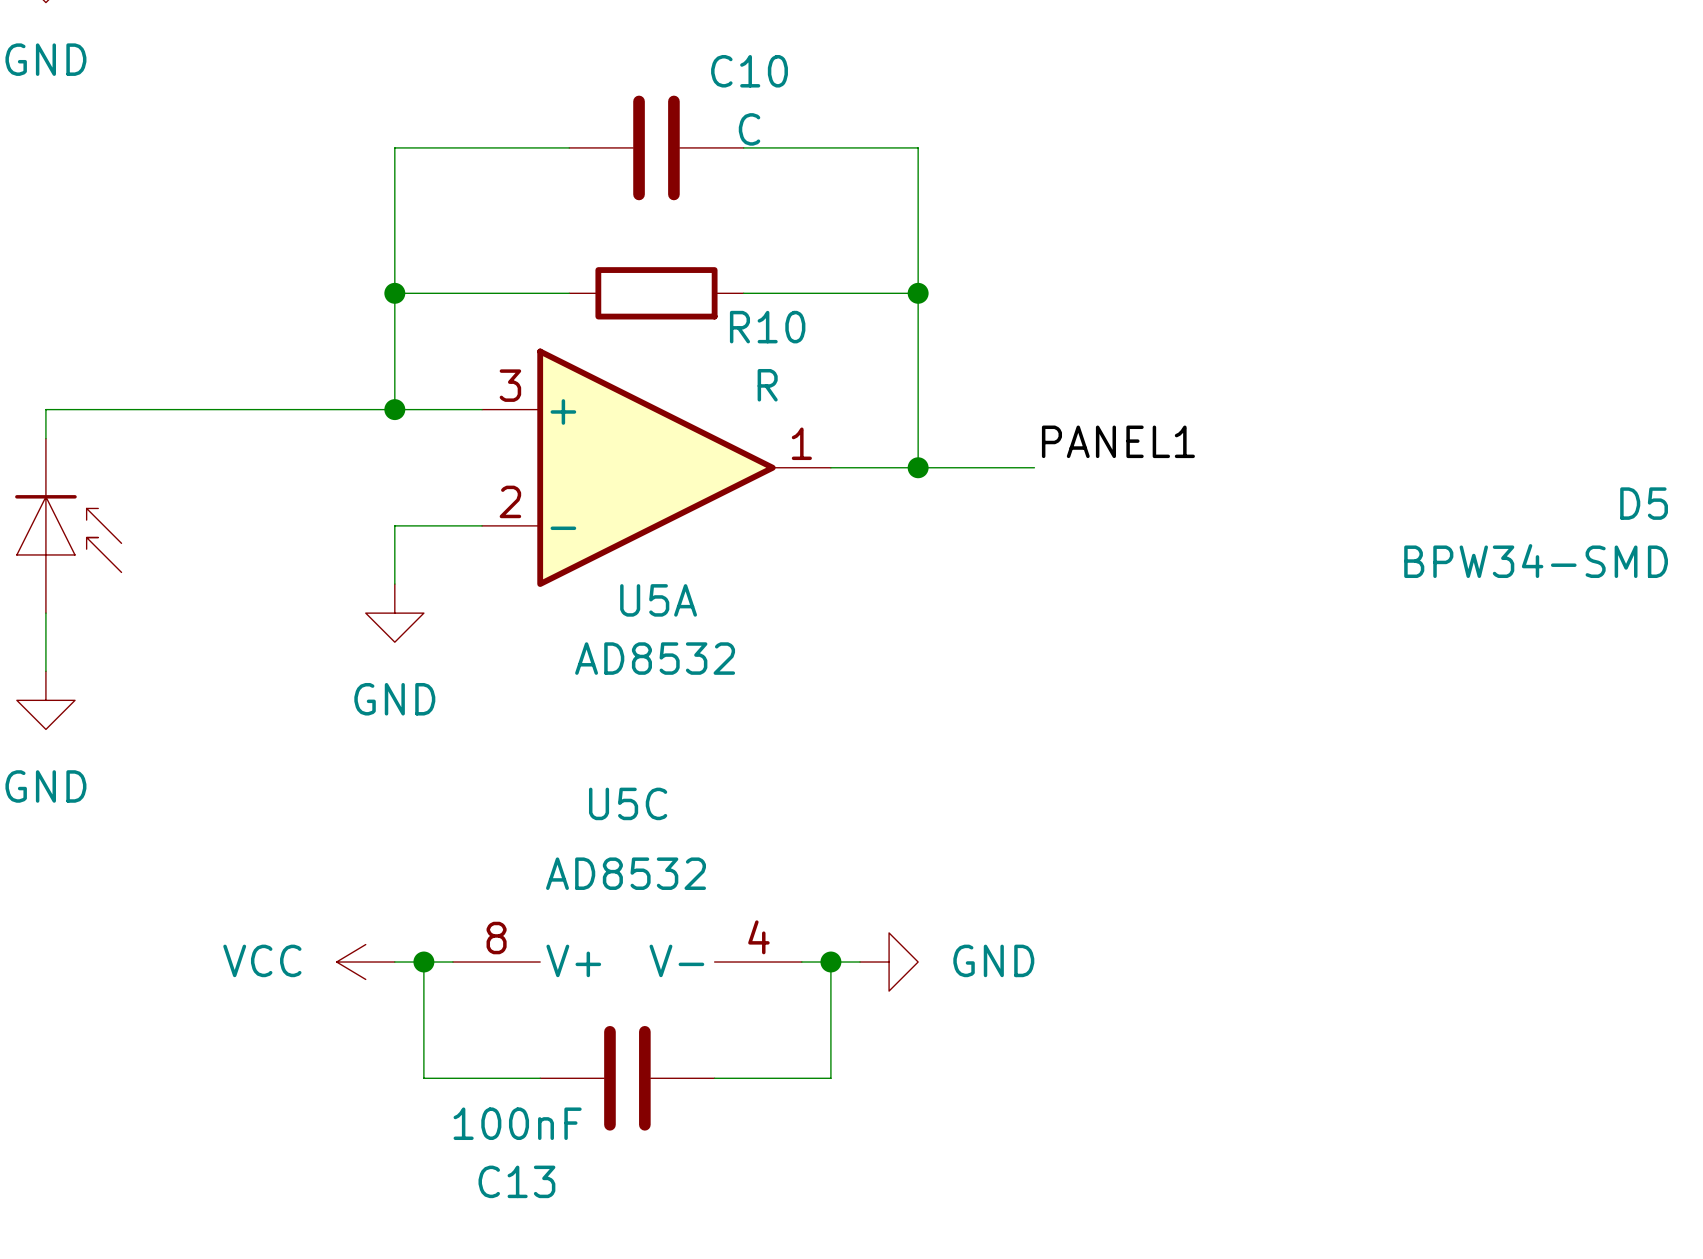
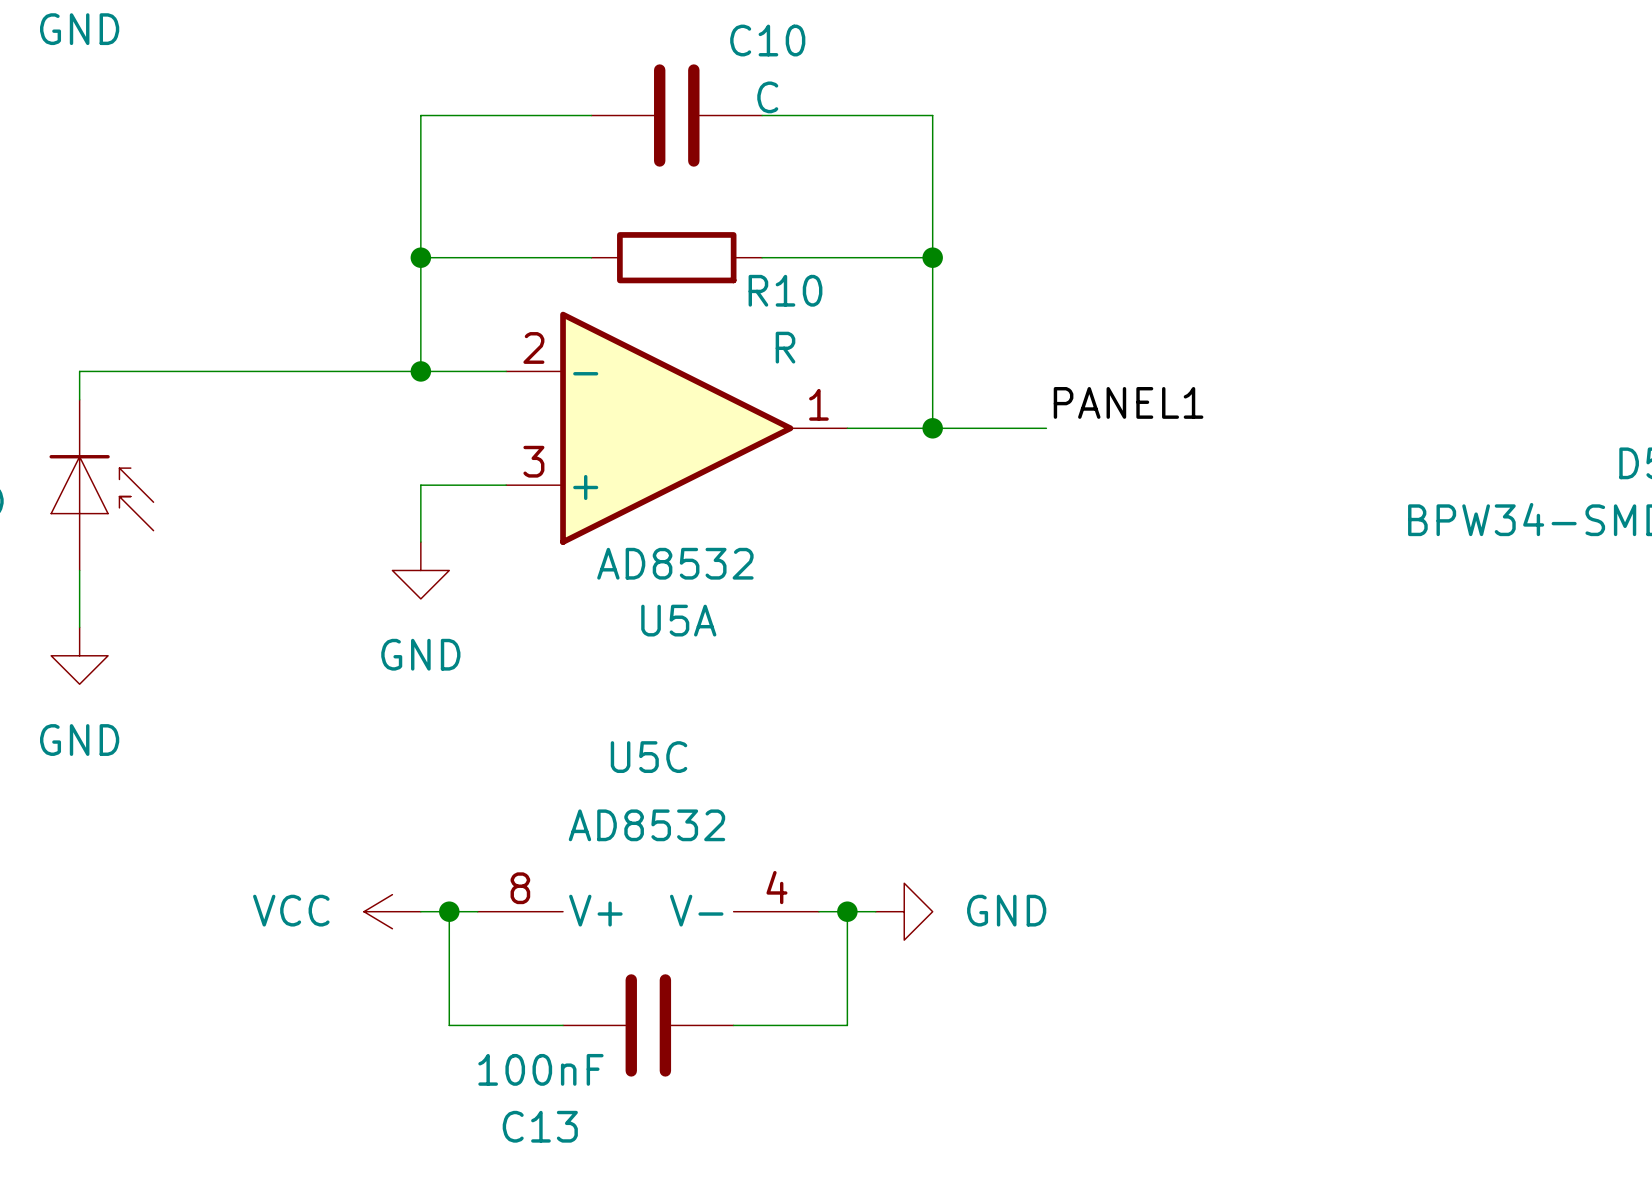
U5A flip: as is (656, 467) -> up-down (676, 428)
U5A name position: U5A (658, 600) -> U5A (678, 620)
U5A value position: AD8532 (655, 658) -> AD8532 (675, 563)

